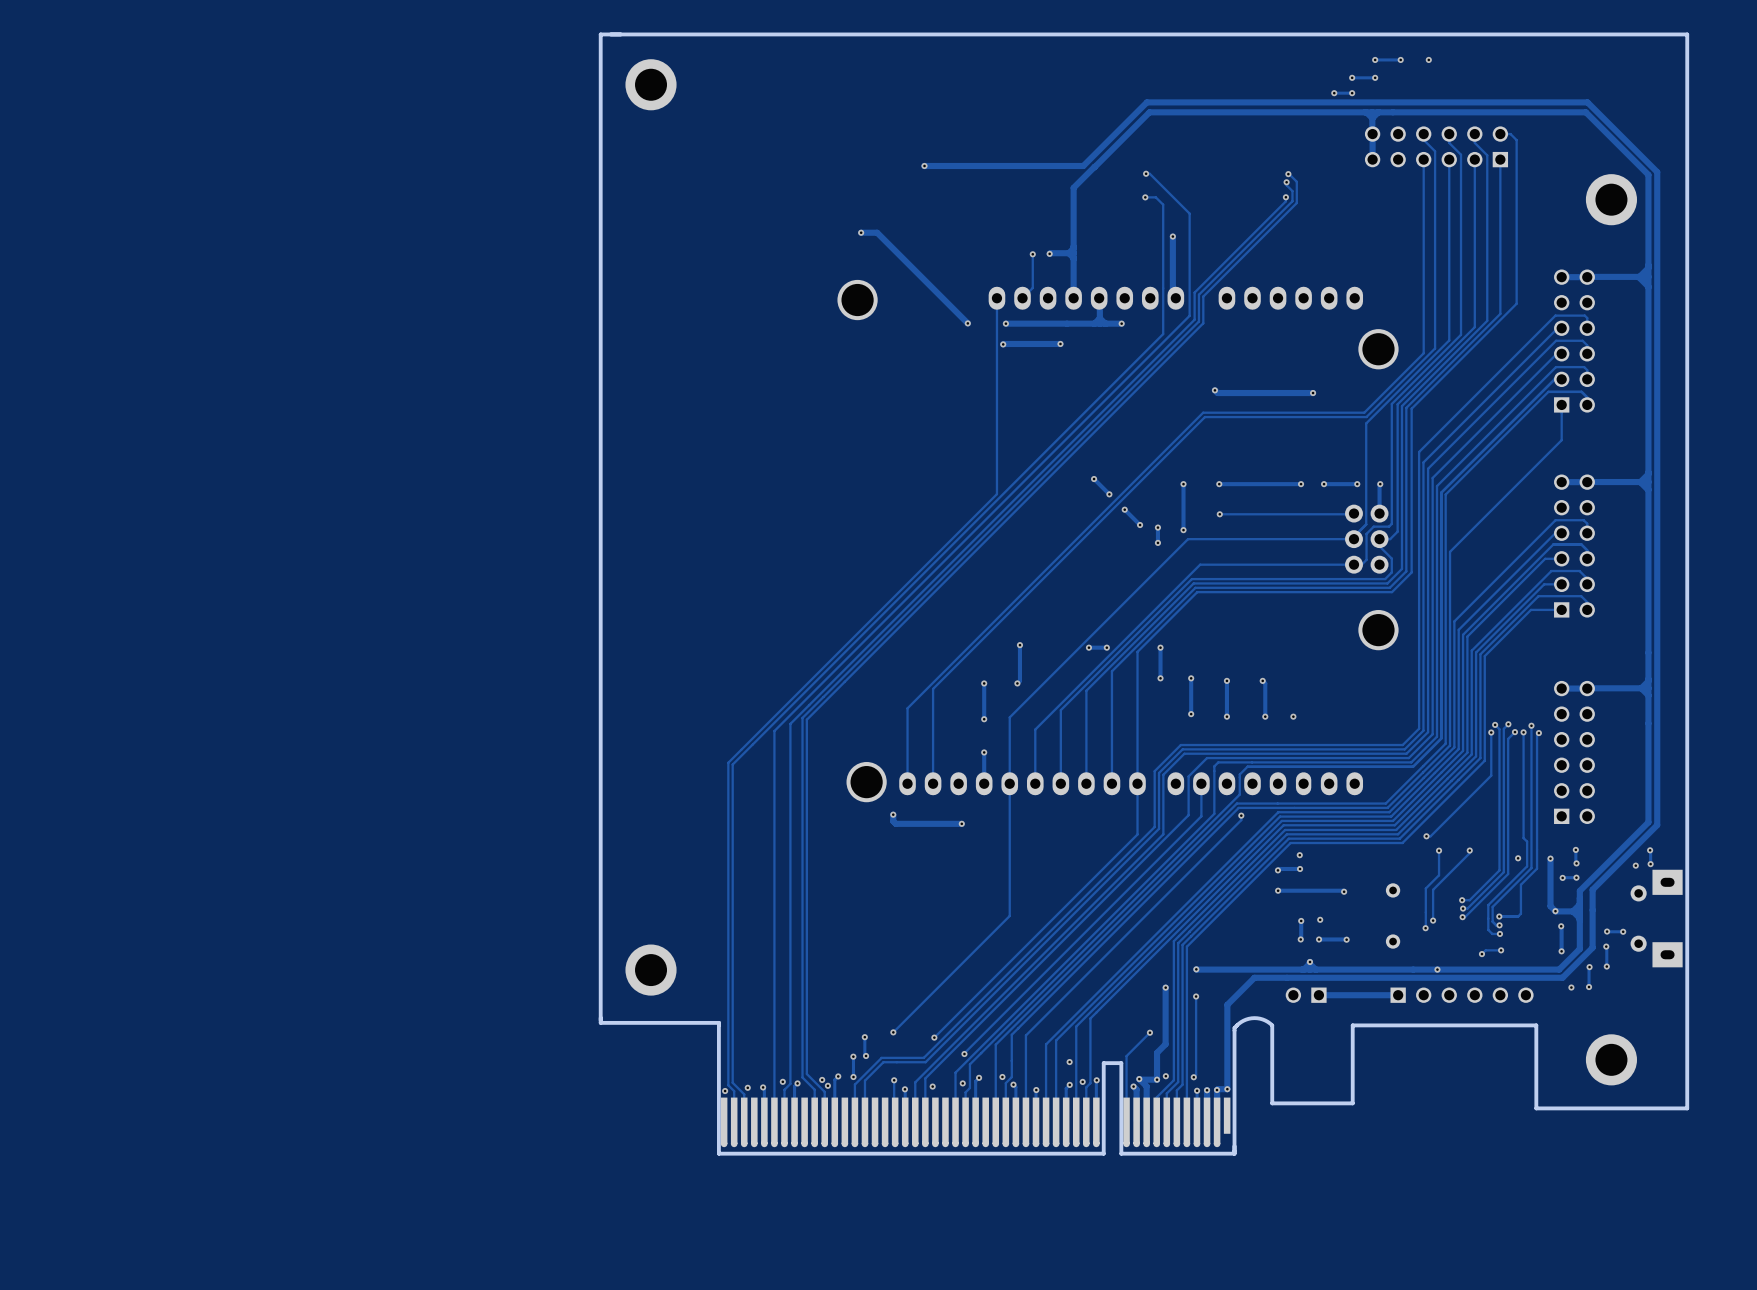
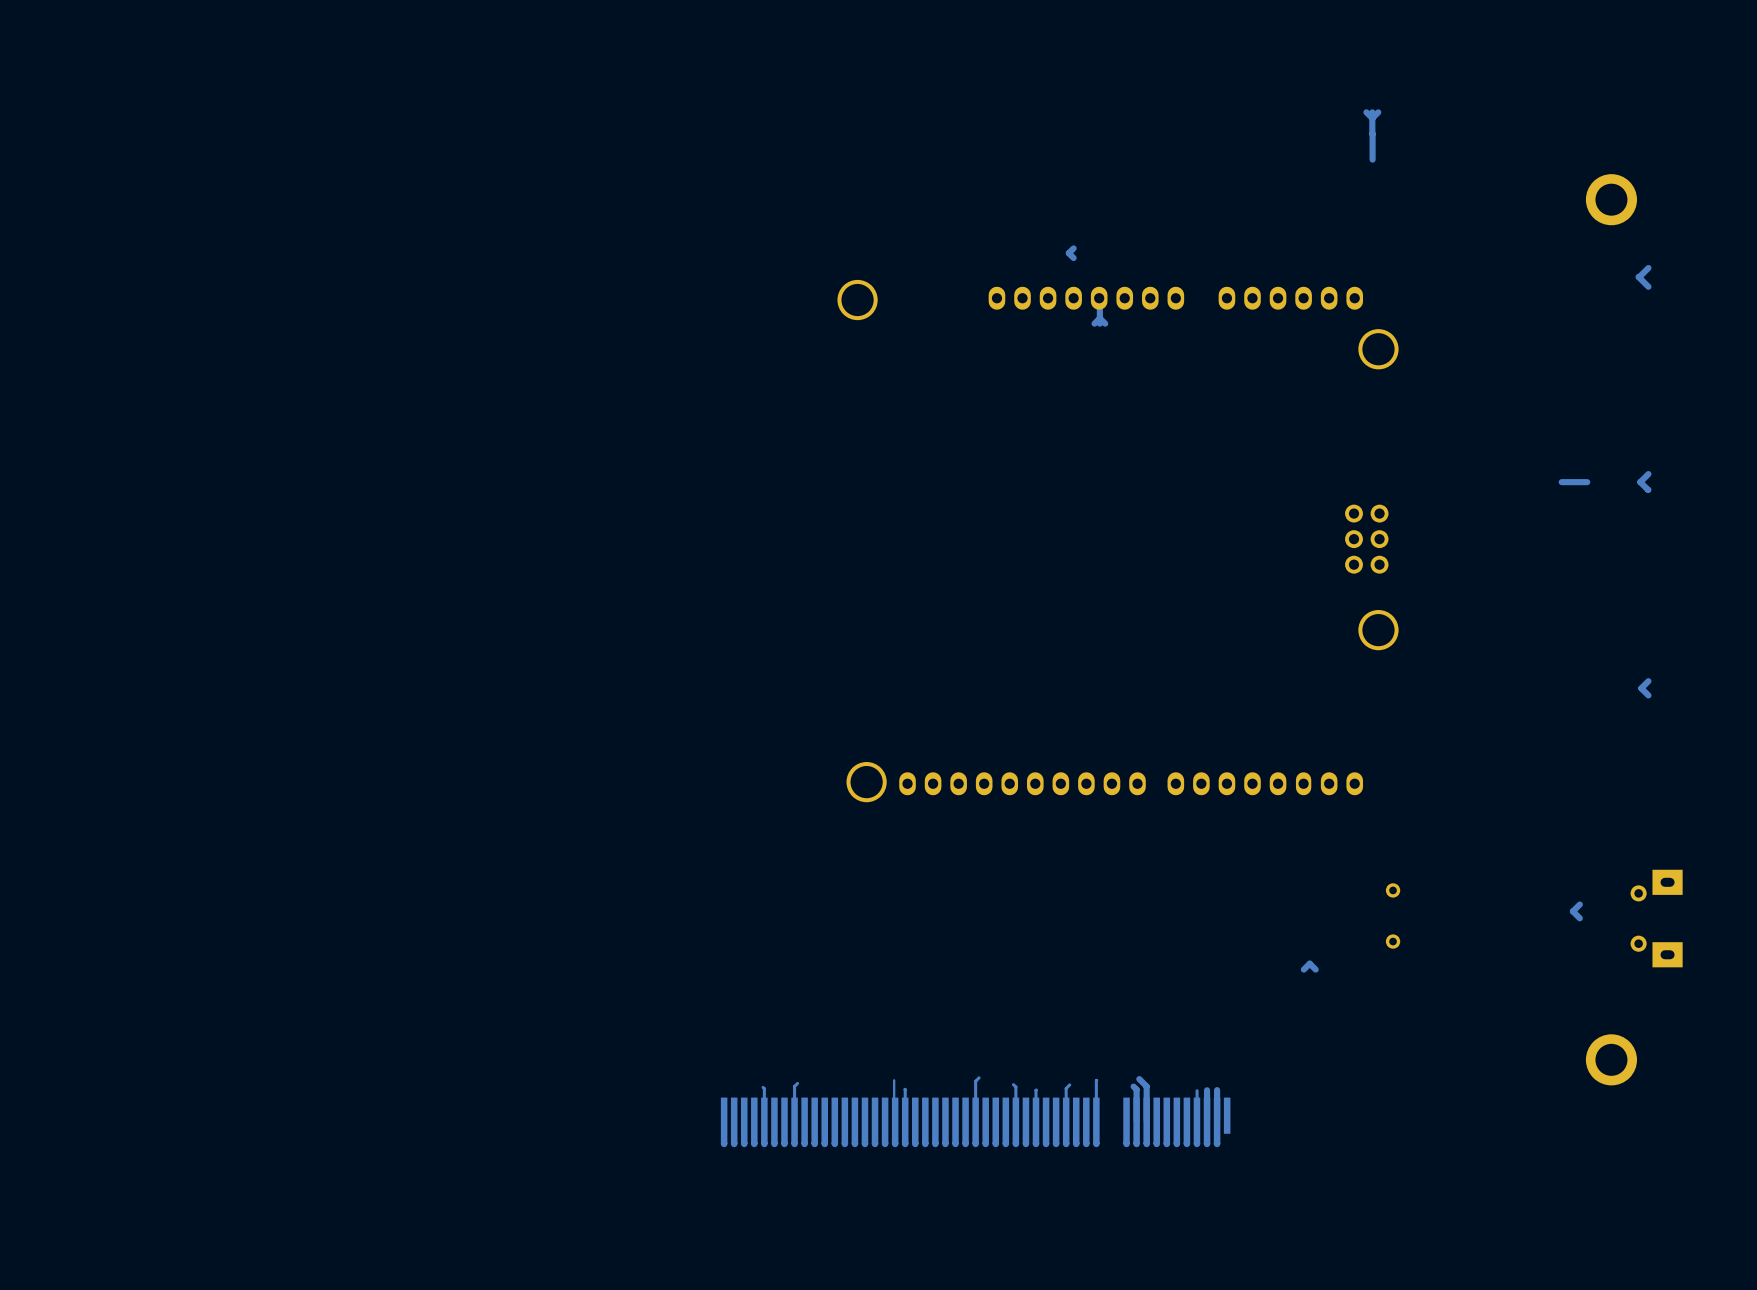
via: (1375, 59) -> none
track: (1400, 59) (1375, 59) -> none
via: (1400, 59) -> none
via: (1428, 59) -> none
via: (1352, 77) -> none
track: (1375, 77) (1352, 77) -> none
via: (1375, 77) -> none
part: (651, 84) -> none
via: (1334, 93) -> none
track: (1352, 93) (1334, 93) -> none
via: (1352, 93) -> none
track: (1423, 134) (1423, 139) (1435, 151) (1435, 348) (1366, 417) (1204, 417) (933, 688) (933, 783) -> none
track: (1449, 134) (1449, 143) (1461, 154) (1461, 334) (1391, 403) (1391, 523) (1389, 526) (1373, 526) (1366, 533) (1366, 559) (1361, 564) (1200, 564) (1035, 729) (1035, 783) -> none
track: (1474, 134) (1474, 142) (1487, 155) (1487, 320) (1401, 406) (1401, 568) (1387, 583) (1193, 583) (1086, 690) (1086, 783) -> none
track: (1500, 134) (1510, 134) (1516, 140) (1516, 303) (1411, 408) (1411, 572) (1391, 592) (1197, 592) (1137, 651) (1137, 834) (934, 1037) -> none
part: (1436, 146) -> none
track: (1423, 159) (1423, 353) (1364, 412) (1203, 412) (907, 708) (907, 783) -> none
track: (1449, 159) (1449, 340) (1366, 423) (1366, 524) (1354, 536) (1354, 539) (1188, 539) (1009, 717) (1009, 915) (893, 1032) -> none
track: (1474, 159) (1474, 327) (1397, 404) (1397, 531) (1390, 539) (1379, 539) (1379, 546) (1391, 558) (1391, 572) (1385, 579) (1191, 579) (1060, 710) (1060, 783) -> none
track: (1500, 159) (1500, 313) (1406, 407) (1406, 571) (1389, 587) (1195, 587) (1111, 671) (1111, 783) -> none
track: (924, 165) (1083, 165) (1146, 102) (1587, 102) (1657, 172) (1657, 825) (1592, 889) (1592, 947) (1562, 977) (1254, 977) (1227, 1004) (1227, 1089) (1217, 1090) -> none
via: (924, 165) -> none
track: (1146, 173) (1149, 173) (1189, 213) (1189, 315) (774, 731) (774, 1120) -> none
via: (1146, 173) -> none
track: (1288, 174) (1296, 181) (1296, 203) (1203, 296) (1203, 323) (806, 719) (806, 1074) (824, 1091) (824, 1120) -> none
via: (1288, 174) -> none
track: (1286, 182) (1286, 185) (1292, 191) (1292, 201) (1198, 294) (1198, 321) (802, 717) (802, 1077) (814, 1089) (814, 1120) -> none
via: (1286, 182) -> none
track: (1145, 197) (1155, 197) (1163, 204) (1163, 334) (732, 764) (732, 1082) (744, 1094) (744, 1120) -> none
via: (1145, 197) -> none
track: (1285, 197) (1285, 201) (1194, 292) (1194, 319) (790, 723) (790, 1083) (784, 1089) (784, 1120) -> none
via: (1285, 197) -> none
track: (861, 232) (877, 232) (967, 323) -> none
via: (861, 232) -> none
track: (1172, 236) (1172, 295) (1175, 298) -> none
via: (1172, 236) -> none
via: (1049, 253) -> none
track: (1073, 253) (1049, 253) -> none
track: (1032, 254) (1032, 287) (1022, 298) -> none
via: (1032, 254) -> none
track: (1648, 276) (1561, 277) -> none
track: (996, 298) (996, 494) (728, 762) (728, 1085) (734, 1091) (734, 1120) -> none
track: (1073, 298) (1073, 187) (1149, 112) (1585, 112) (1648, 174) (1648, 822) (1579, 890) (1579, 948) (1559, 969) (1196, 969) -> none
via: (967, 323) -> none
via: (1005, 323) -> none
track: (1121, 323) (1005, 323) -> none
via: (1121, 323) -> none
track: (1561, 328) (1557, 328) (1423, 462) (1423, 730) (1404, 749) (1182, 749) (1159, 772) (1159, 828) (925, 1062) (883, 1062) (864, 1080) (864, 1120) -> none
track: (1587, 328) (1587, 318) (1584, 315) (1555, 315) (1419, 451) (1419, 728) (1402, 745) (1180, 745) (1154, 771) (1154, 827) (923, 1057) (881, 1057) (854, 1084) (854, 1120) -> none
part: (1574, 341) -> none
track: (1060, 343) (1003, 344) -> none
via: (1060, 343) -> none
via: (1003, 344) -> none
track: (1561, 353) (1556, 353) (1432, 478) (1432, 734) (1408, 758) (1207, 758) (1188, 776) (1188, 815) (925, 1078) (925, 1120) -> none
track: (1587, 353) (1587, 345) (1582, 340) (1556, 340) (1428, 468) (1428, 732) (1406, 753) (1184, 753) (1163, 774) (1163, 834) (915, 1082) (915, 1120) -> none
track: (1561, 379) (1554, 379) (1441, 492) (1441, 738) (1413, 766) (1247, 766) (1239, 774) (1239, 794) (969, 1064) (969, 1088) (965, 1092) (965, 1120) -> none
track: (1587, 379) (1587, 370) (1584, 367) (1556, 367) (1436, 486) (1436, 736) (1411, 762) (1218, 762) (1214, 766) (1214, 813) (955, 1072) (955, 1120) -> none
track: (1214, 390) (1217, 393) (1313, 393) -> none
via: (1214, 390) -> none
via: (1313, 393) -> none
track: (1561, 404) (1561, 440) (1450, 551) (1450, 745) (1387, 807) (1238, 807) (1011, 1034) (1011, 1077) (1005, 1083) (1005, 1120) -> none
track: (1587, 404) (1587, 397) (1581, 391) (1548, 391) (1445, 494) (1445, 743) (1385, 803) (1236, 803) (995, 1044) (995, 1120) -> none
track: (1094, 479) (1109, 494) -> none
via: (1094, 479) -> none
track: (1648, 482) (1587, 482) -> none
track: (1183, 484) (1183, 530) -> none
via: (1183, 484) -> none
via: (1219, 484) -> none
track: (1301, 484) (1219, 484) -> none
via: (1301, 484) -> none
via: (1324, 484) -> none
track: (1357, 484) (1324, 484) -> none
via: (1357, 484) -> none
track: (1380, 484) (1379, 513) -> none
via: (1380, 484) -> none
via: (1109, 494) -> none
track: (1124, 509) (1140, 525) -> none
via: (1124, 509) -> none
track: (1354, 513) (1219, 514) -> none
via: (1219, 514) -> none
via: (1140, 525) -> none
track: (1157, 527) (1157, 542) -> none
via: (1157, 527) -> none
via: (1183, 530) -> none
track: (1561, 533) (1555, 533) (1458, 629) (1458, 749) (1391, 816) (1280, 816) (1056, 1040) (1056, 1120) -> none
track: (1587, 533) (1587, 523) (1583, 520) (1555, 520) (1454, 621) (1454, 747) (1389, 812) (1278, 812) (1046, 1044) (1046, 1120) -> none
via: (1157, 542) -> none
part: (1574, 546) -> none
track: (1561, 558) (1545, 558) (1467, 636) (1467, 752) (1394, 825) (1283, 825) (1090, 1018) (1090, 1083) (1086, 1087) (1086, 1120) -> none
track: (1587, 558) (1587, 550) (1581, 544) (1553, 544) (1463, 634) (1463, 750) (1393, 820) (1281, 820) (1076, 1026) (1076, 1120) -> none
track: (1561, 584) (1544, 584) (1476, 652) (1476, 756) (1398, 834) (1286, 834) (1189, 931) -> none
track: (1587, 584) (1587, 578) (1579, 571) (1551, 571) (1471, 650) (1471, 754) (1396, 829) (1285, 829) (1173, 941) (1173, 1080) (1156, 1097) (1156, 1120) -> none
track: (1561, 609) (1530, 609) (1484, 656) (1484, 760) (1402, 843) (1290, 843) (1186, 946) (1186, 1120) -> none
track: (1587, 609) (1587, 602) (1581, 596) (1538, 596) (1480, 654) (1480, 758) (1399, 838) (1288, 838) (1182, 944) (1182, 1084) (1176, 1090) (1176, 1120) -> none
track: (1019, 645) (1019, 680) (1017, 683) -> none
via: (1019, 645) -> none
via: (1088, 647) -> none
track: (1106, 647) (1088, 647) -> none
via: (1106, 647) -> none
track: (1160, 647) (1160, 678) -> none
via: (1160, 647) -> none
via: (1160, 678) -> none
track: (1191, 678) (1191, 714) -> none
via: (1191, 678) -> none
track: (1226, 680) (1226, 716) -> none
via: (1226, 680) -> none
track: (1262, 680) (1265, 683) (1265, 716) -> none
via: (1262, 680) -> none
track: (984, 683) (984, 719) -> none
via: (984, 683) -> none
via: (1017, 683) -> none
track: (1648, 688) (1561, 688) -> none
via: (1191, 714) -> none
via: (1226, 716) -> none
via: (1265, 716) -> none
via: (1293, 716) -> none
via: (984, 719) -> none
track: (1495, 724) (1499, 729) (1499, 870) (1469, 900) (1462, 900) -> none
via: (1495, 724) -> none
track: (1508, 724) (1503, 728) (1503, 872) (1467, 908) (1463, 908) -> none
via: (1508, 724) -> none
track: (1531, 725) (1531, 868) (1492, 906) (1492, 921) (1496, 925) (1499, 925) -> none
via: (1531, 725) -> none
track: (1491, 732) (1491, 775) (1430, 836) (1426, 836) -> none
via: (1491, 732) -> none
track: (1514, 732) (1508, 738) (1508, 874) (1465, 917) (1462, 917) -> none
via: (1514, 732) -> none
track: (1523, 732) (1523, 838) (1527, 841) (1527, 866) (1488, 905) (1488, 929) (1492, 933) (1499, 933) -> none
via: (1523, 732) -> none
track: (1538, 733) (1537, 734) (1537, 868) (1520, 884) (1520, 913) (1518, 916) (1499, 916) -> none
via: (1538, 733) -> none
track: (984, 752) (984, 783) -> none
via: (984, 752) -> none
part: (1574, 752) -> none
track: (1201, 783) (1201, 816) (964, 1054) -> none
track: (893, 814) (893, 821) (895, 823) (961, 823) -> none
via: (893, 814) -> none
track: (1241, 815) (1241, 820) (1025, 1035) (1025, 1120) -> none
via: (1241, 815) -> none
via: (961, 823) -> none
via: (1426, 836) -> none
track: (1575, 849) (1576, 863) -> none
via: (1575, 849) -> none
track: (1439, 850) (1439, 875) (1425, 888) (1425, 928) -> none
via: (1439, 850) -> none
track: (1469, 850) (1469, 853) (1433, 889) (1433, 920) -> none
via: (1469, 850) -> none
track: (1650, 850) (1650, 864) -> none
via: (1650, 850) -> none
via: (1299, 855) -> none
via: (1518, 858) -> none
track: (1550, 858) (1550, 906) (1555, 911) (1579, 911) -> none
via: (1550, 858) -> none
via: (1576, 863) -> none
via: (1650, 864) -> none
via: (1635, 865) -> none
track: (1300, 868) (1277, 870) -> none
via: (1300, 868) -> none
via: (1277, 870) -> none
via: (1562, 877) -> none
track: (1576, 877) (1562, 877) -> none
via: (1576, 877) -> none
track: (1278, 890) (1344, 891) -> none
via: (1278, 890) -> none
via: (1344, 891) -> none
via: (1462, 900) -> none
via: (1463, 908) -> none
via: (1555, 911) -> none
via: (1499, 916) -> none
via: (1462, 917) -> none
via: (1320, 919) -> none
track: (1301, 920) (1300, 939) -> none
via: (1301, 920) -> none
via: (1433, 920) -> none
via: (1499, 925) -> none
track: (1561, 926) (1561, 951) -> none
via: (1561, 926) -> none
via: (1425, 928) -> none
track: (1189, 931) (1178, 943) (1178, 1082) (1166, 1093) (1166, 1120) -> none
track: (1607, 931) (1623, 931) -> none
via: (1607, 931) -> none
via: (1623, 931) -> none
via: (1499, 933) -> none
via: (1300, 939) -> none
track: (1319, 939) (1346, 939) -> none
via: (1319, 939) -> none
via: (1346, 939) -> none
track: (1606, 946) (1606, 966) -> none
via: (1606, 946) -> none
track: (1501, 950) (1485, 950) (1481, 954) -> none
via: (1501, 950) -> none
via: (1561, 951) -> none
via: (1481, 954) -> none
via: (1309, 961) -> none
via: (1606, 966) -> none
track: (1589, 967) (1589, 987) -> none
via: (1589, 967) -> none
via: (1196, 969) -> none
via: (1437, 969) -> none
part: (651, 970) -> none
track: (1165, 987) (1165, 1044) (1157, 1052) (1157, 1079) (1139, 1079) -> none
via: (1165, 987) -> none
via: (1571, 987) -> none
via: (1589, 987) -> none
part: (1306, 995) -> none
track: (1398, 995) (1318, 995) -> none
part: (1462, 995) -> none
track: (1196, 996) (1196, 1074) (1193, 1077) -> none
via: (1196, 996) -> none
board edge: (1237, 1025) (1234, 1027) (1234, 1153) (1121, 1153) (1121, 1063) (1103, 1063) (1103, 1153) (718, 1153) (718, 1022) (600, 1022) (600, 34) (1687, 34) (1687, 1108) (1536, 1108) (1536, 1025) (1352, 1025) (1352, 1103) (1272, 1103) (1272, 1025) (1265, 1020) (1254, 1018) (1243, 1020) (1236, 1025) -> none
via: (893, 1032) -> none
track: (1149, 1032) (1126, 1056) (1126, 1120) -> none
via: (1149, 1032) -> none
track: (864, 1037) (866, 1055) -> none
via: (864, 1037) -> none
via: (934, 1037) -> none
via: (964, 1054) -> none
via: (866, 1055) -> none
track: (853, 1056) (853, 1077) -> none
via: (853, 1056) -> none
via: (1069, 1062) -> none
track: (838, 1076) (834, 1079) (834, 1120) -> none
via: (838, 1076) -> none
via: (1165, 1076) -> none
via: (853, 1077) -> none
via: (979, 1077) -> none
via: (1002, 1077) -> none
via: (1193, 1077) -> none
via: (822, 1079) -> none
via: (1139, 1079) -> none
via: (1157, 1079) -> none
via: (894, 1080) -> none
via: (1096, 1080) -> none
via: (782, 1081) -> none
via: (1082, 1081) -> none
via: (797, 1083) -> none
via: (962, 1083) -> none
via: (1013, 1084) -> none
via: (1069, 1084) -> none
via: (827, 1085) -> none
via: (932, 1086) -> none
via: (1133, 1086) -> none
via: (747, 1087) -> none
via: (763, 1087) -> none
via: (904, 1089) -> none
via: (1227, 1089) -> none
via: (1036, 1090) -> none
via: (1197, 1090) -> none
via: (1207, 1090) -> none
via: (1217, 1090) -> none
via: (725, 1091) -> none

